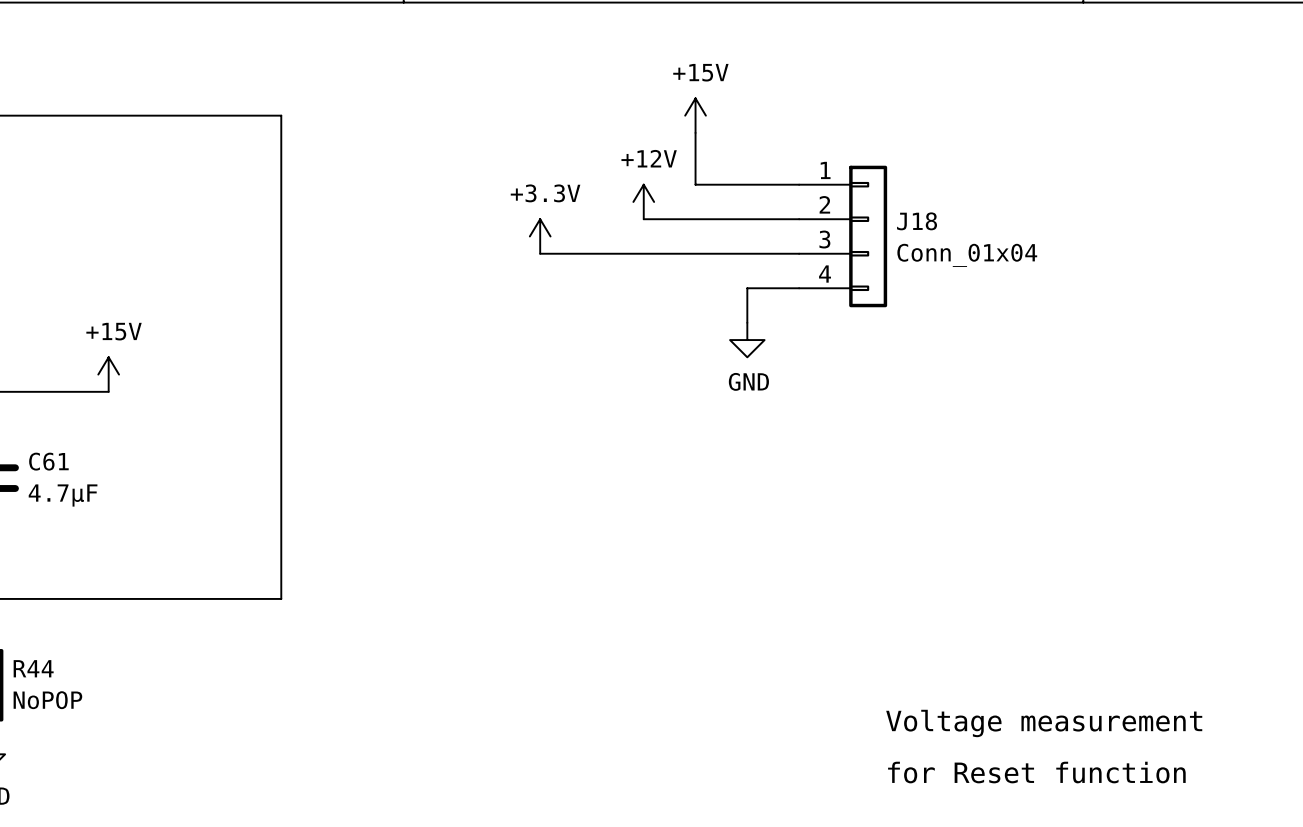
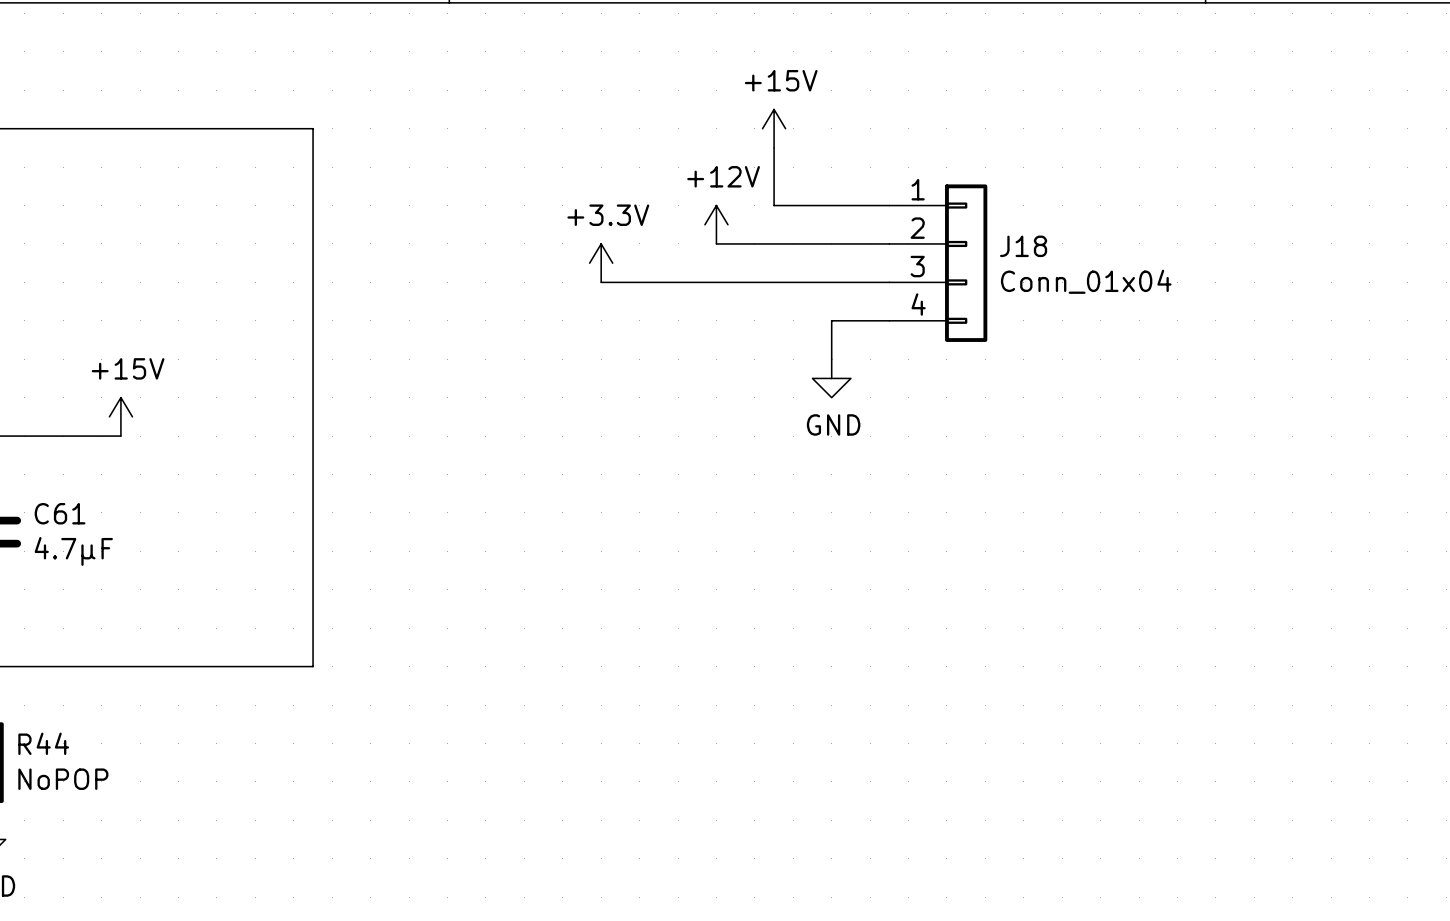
text: Voltage measurement (1044, 723) -> none
text: for Reset function (1036, 772) -> none

